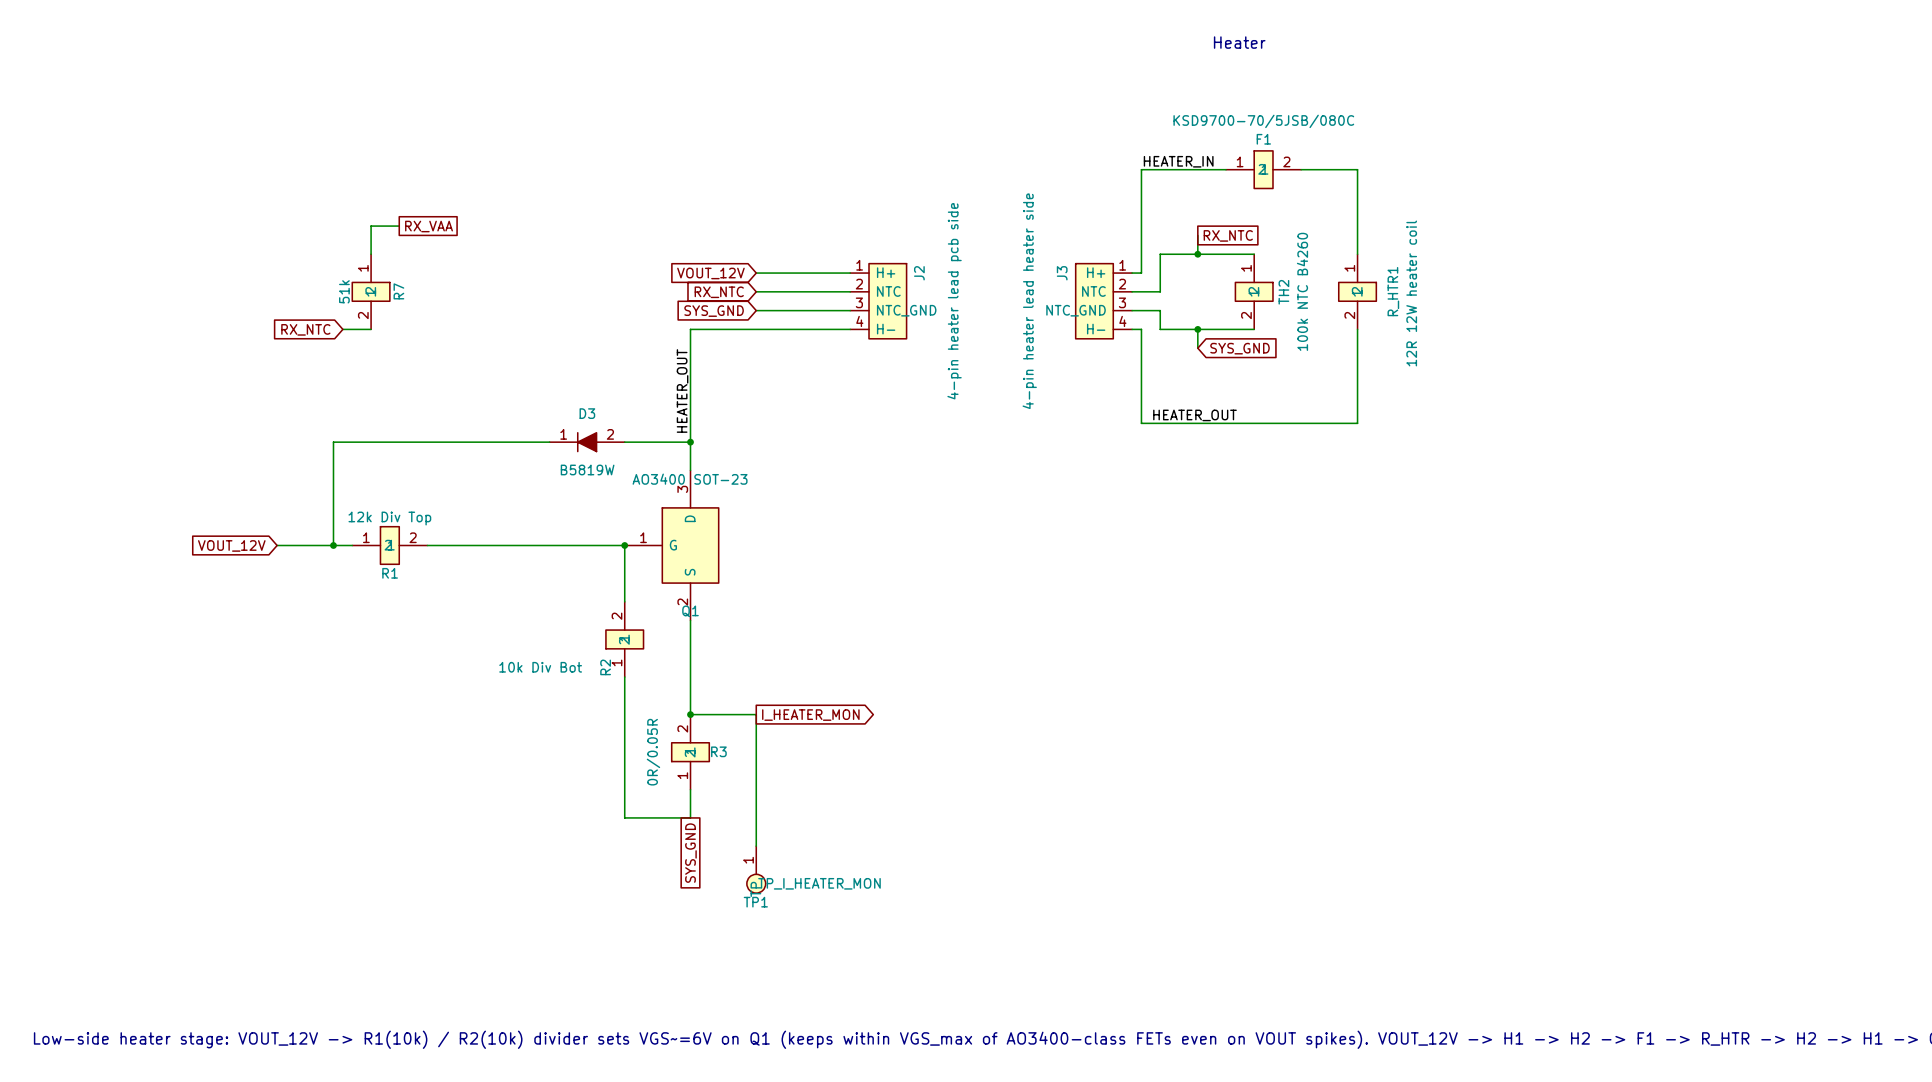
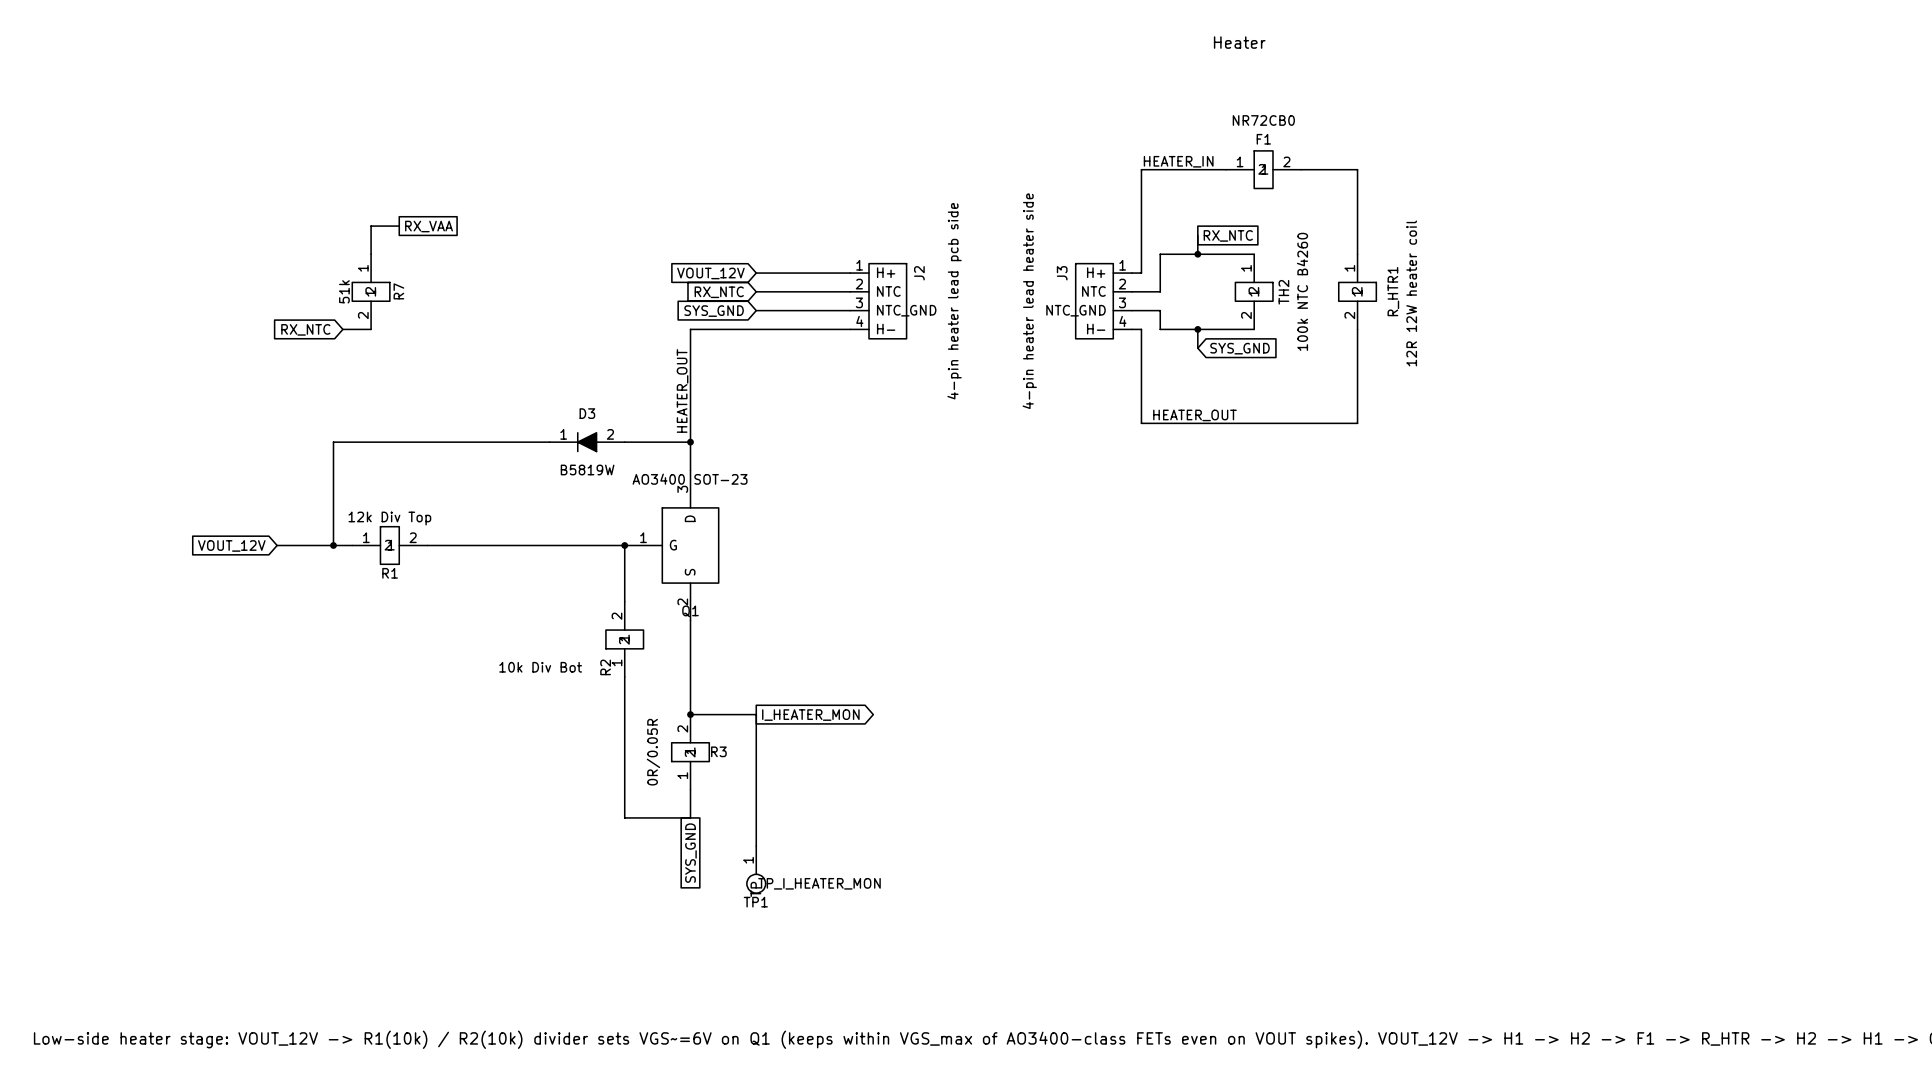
F1 value: KSD9700-70/5JSB/080C (1263, 121) -> NR72CB0 (1263, 120)

